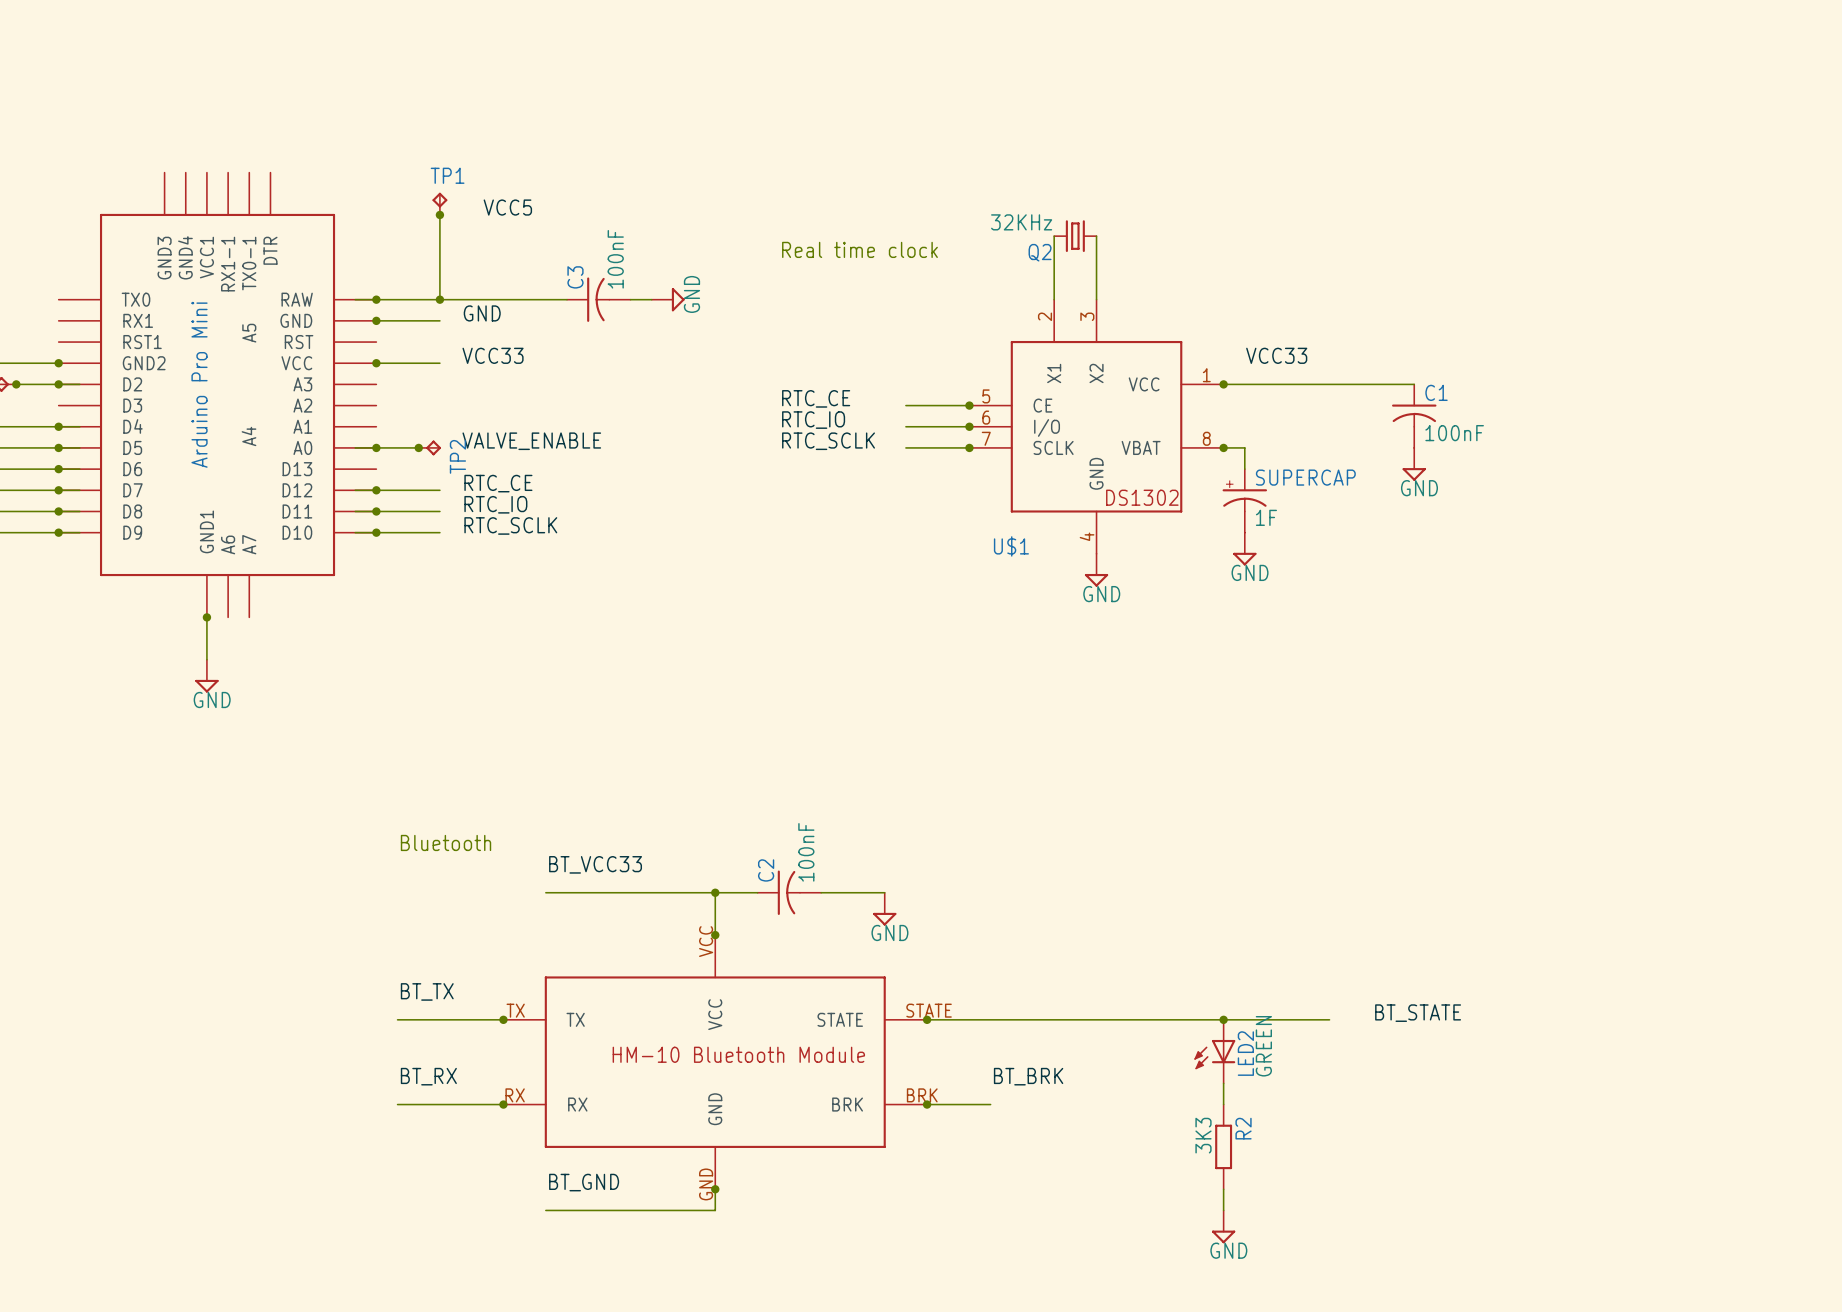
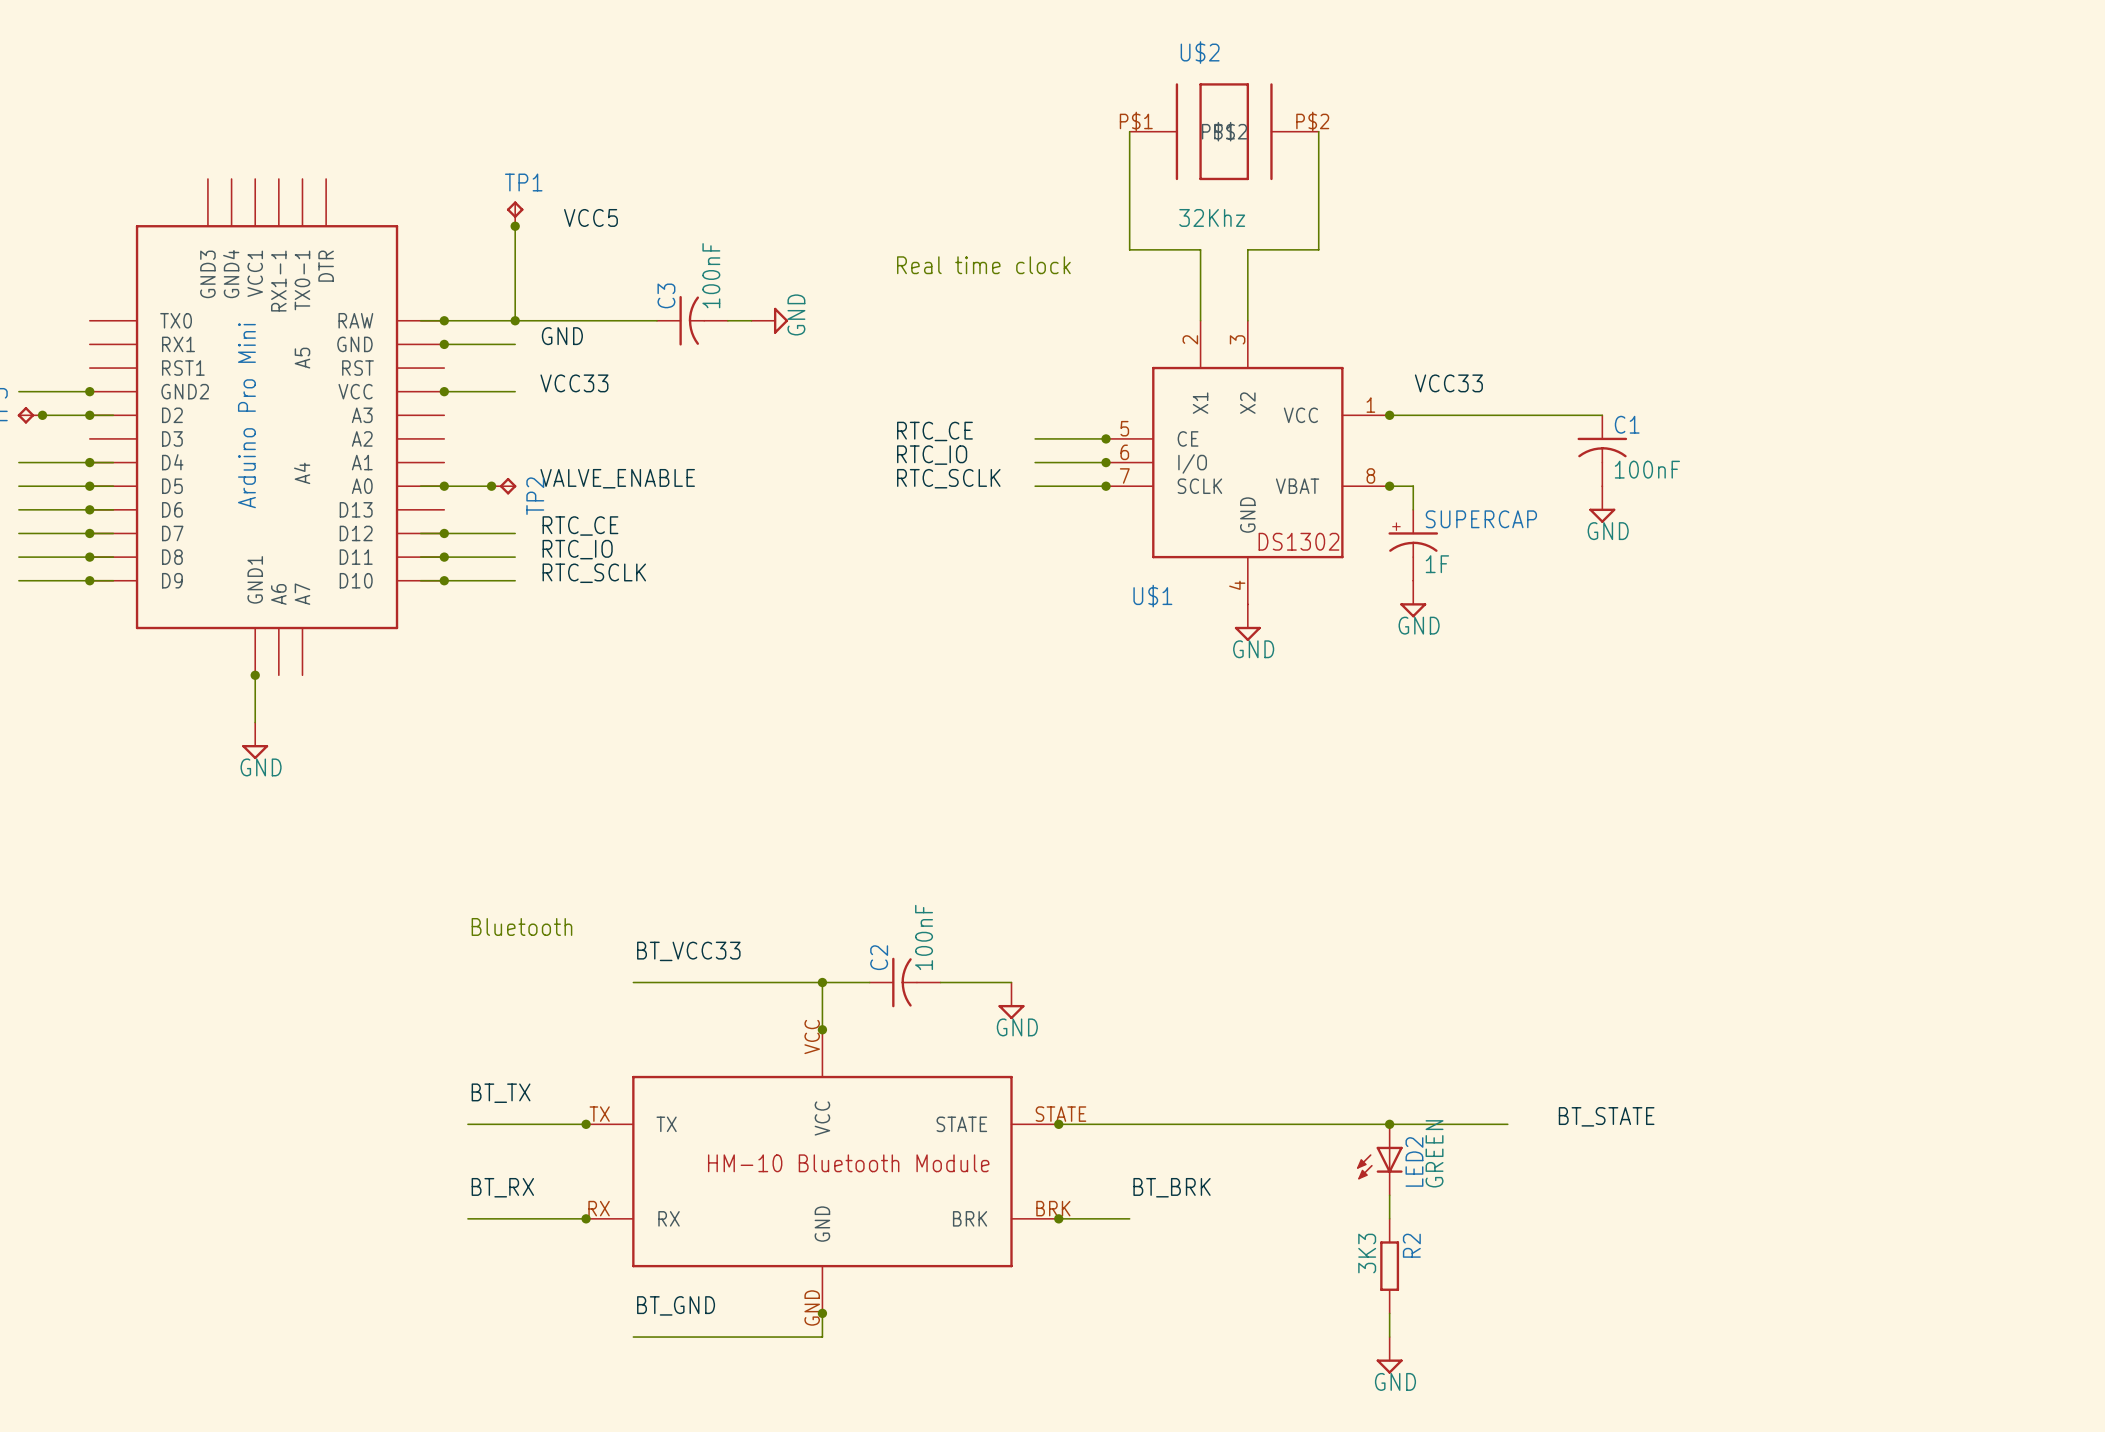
wire: none -> (1129, 131) (1129, 249) (1200, 249)
U$2: none -> 32Khz (1224, 131)
wire: none -> (1318, 131) (1318, 249) (1247, 249)
Q2: 32KHz (1075, 236) -> none

